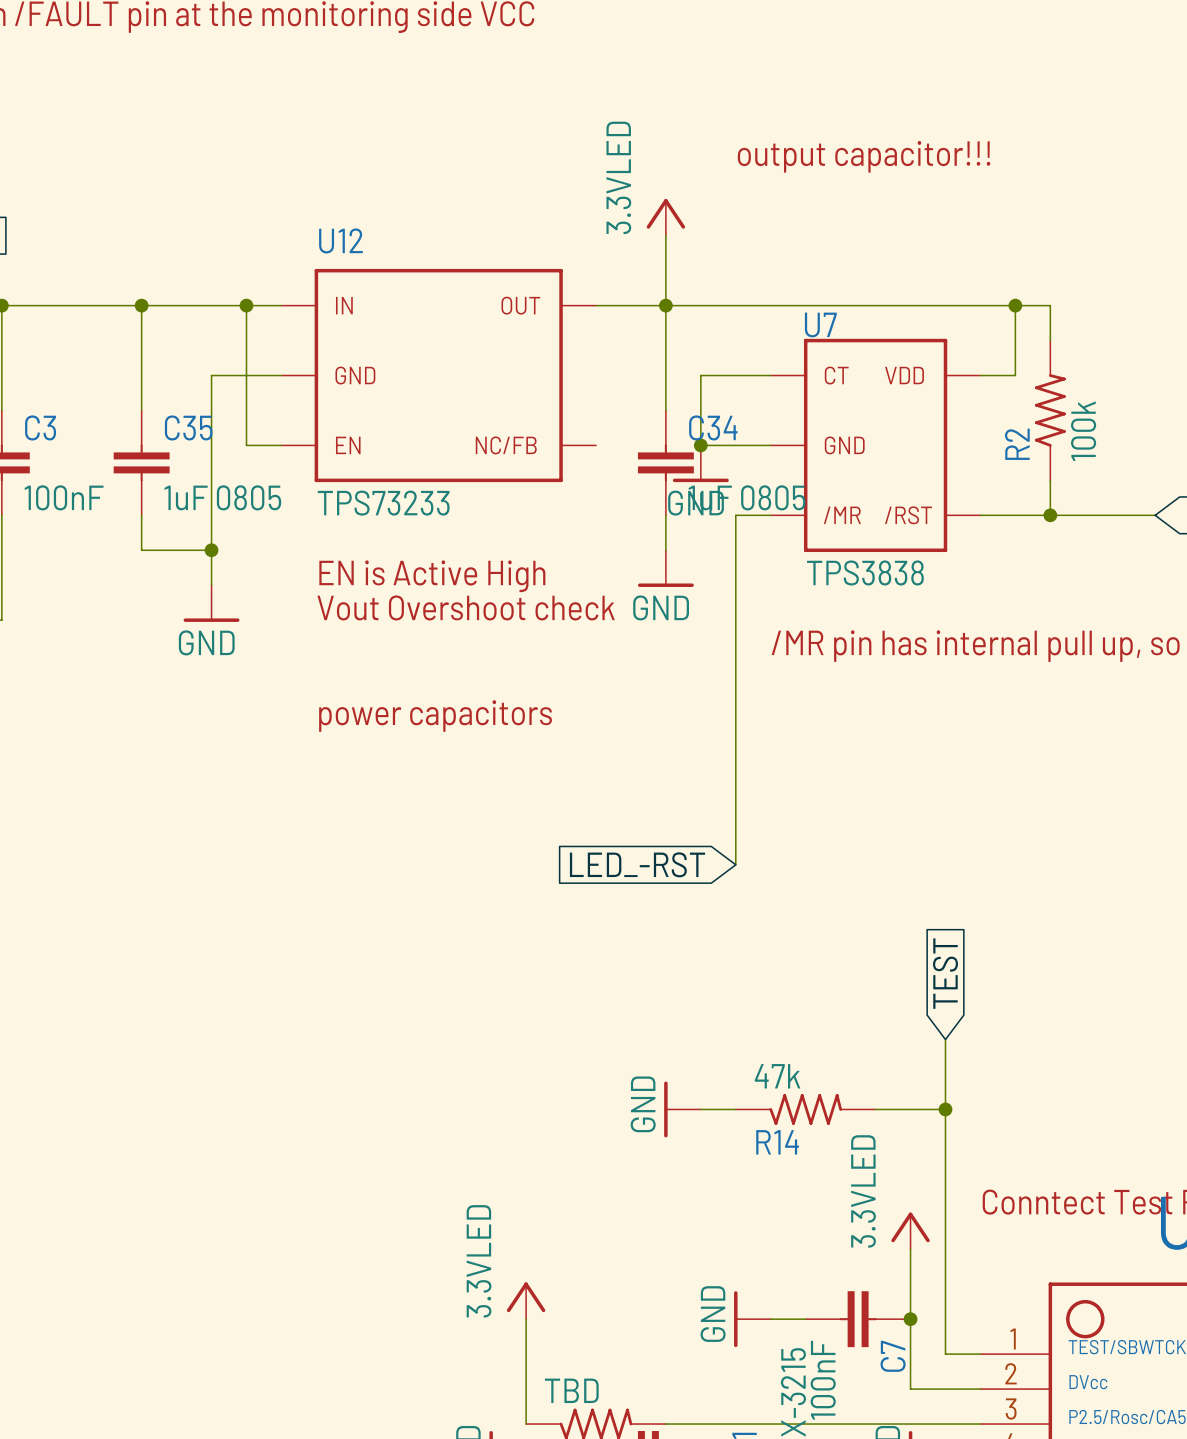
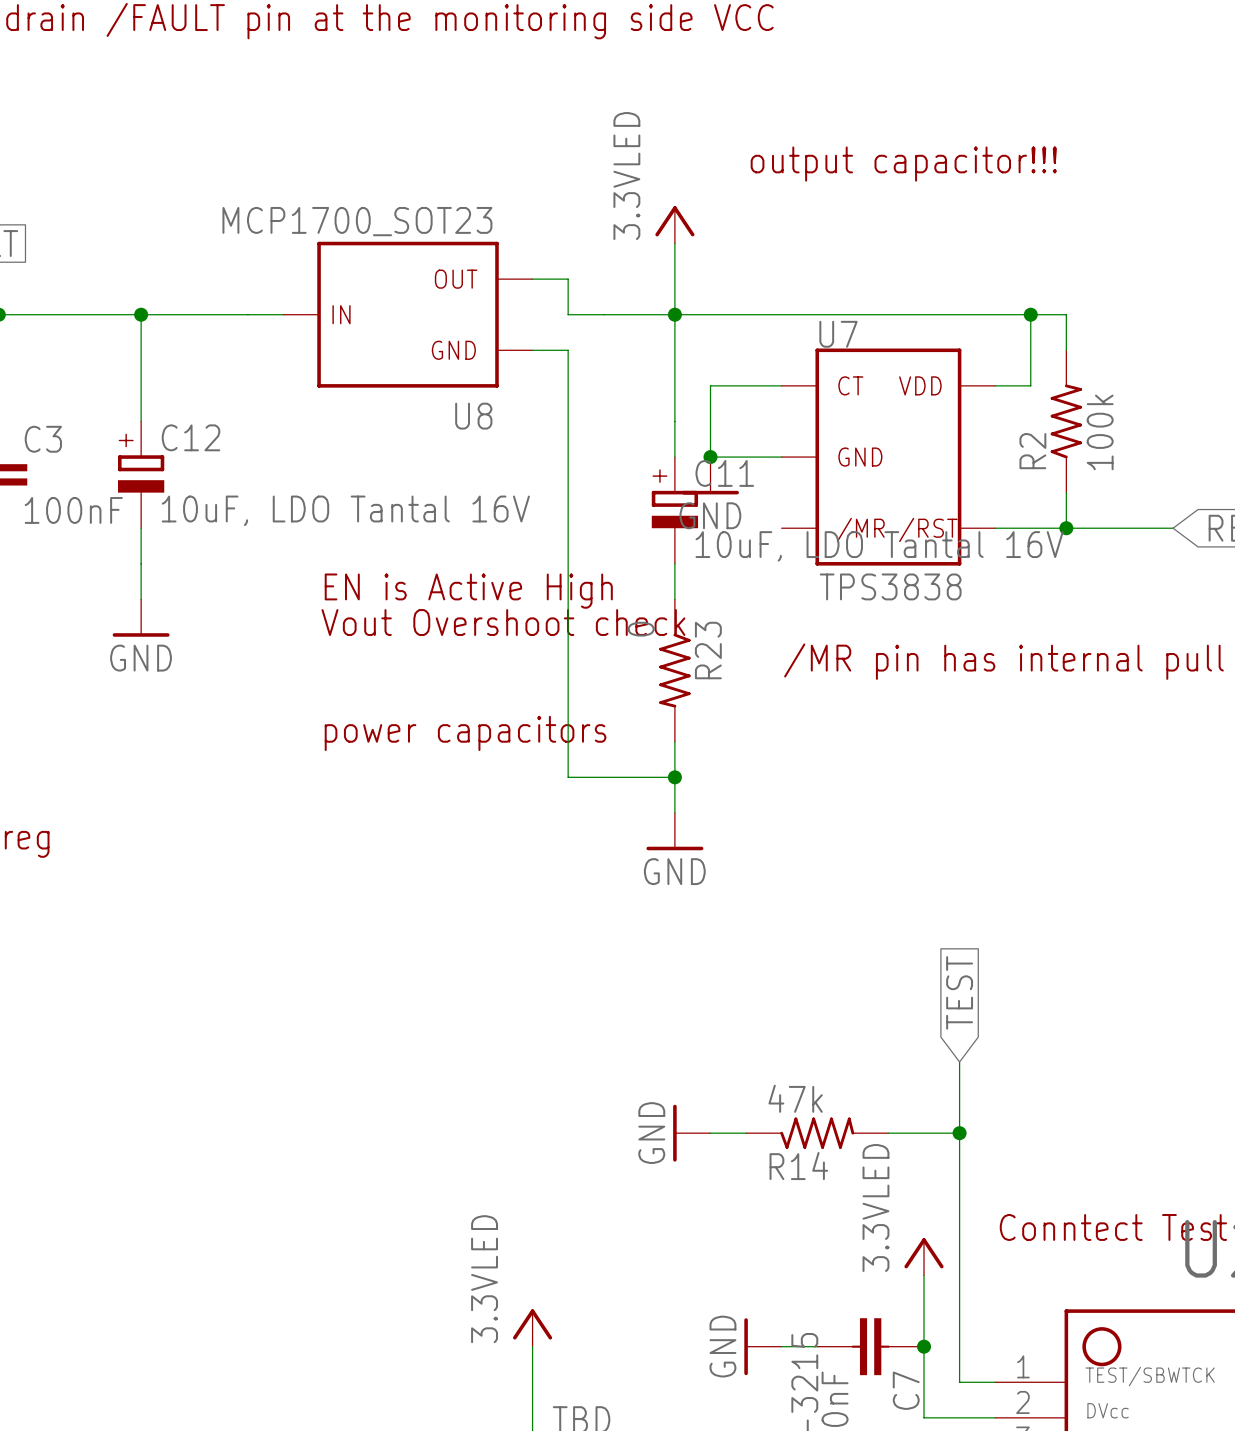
wire: (246, 305) (246, 445) (281, 445) -> none
junction: (246, 305) -> none
U8: none -> MCP1700_SOT23 (408, 314)
wire: none -> (532, 350) (568, 350) (568, 777) (674, 777)
wire: (281, 375) (211, 375) (211, 585) -> none
U12: TPS73233 (438, 375) -> none
C35: 1uF 0805 (141, 462) -> none
C12: none -> 10uF, LDO Tantal 16V (141, 474)
C34: 1uF 0805 (665, 462) -> none
C11: none -> 10uF, LDO Tantal 16V (674, 510)
wire: (770, 515) (735, 515) (735, 864) -> none
wire: (141, 550) (211, 550) -> (141, 563) (141, 599)
junction: (211, 550) -> none
power symbol position: GND (665, 568) -> GND (674, 831)
power symbol position: GND (211, 603) -> GND (141, 618)
R23: none -> 0 (674, 670)
wire: none -> (674, 741) (674, 812)
junction: none -> (674, 777)
global label: LED_-RST (637, 864) -> none

